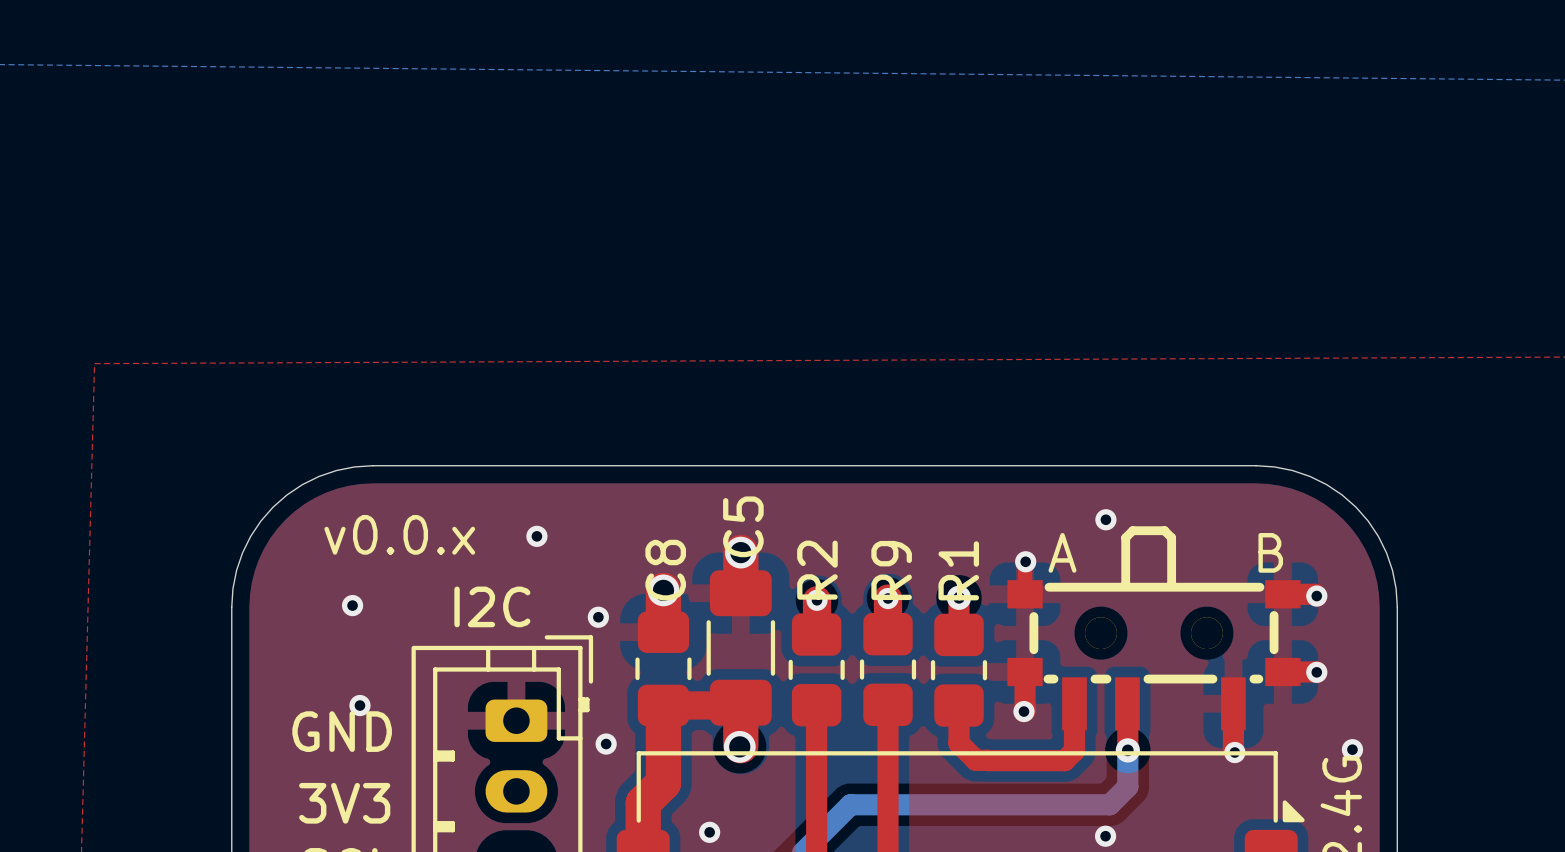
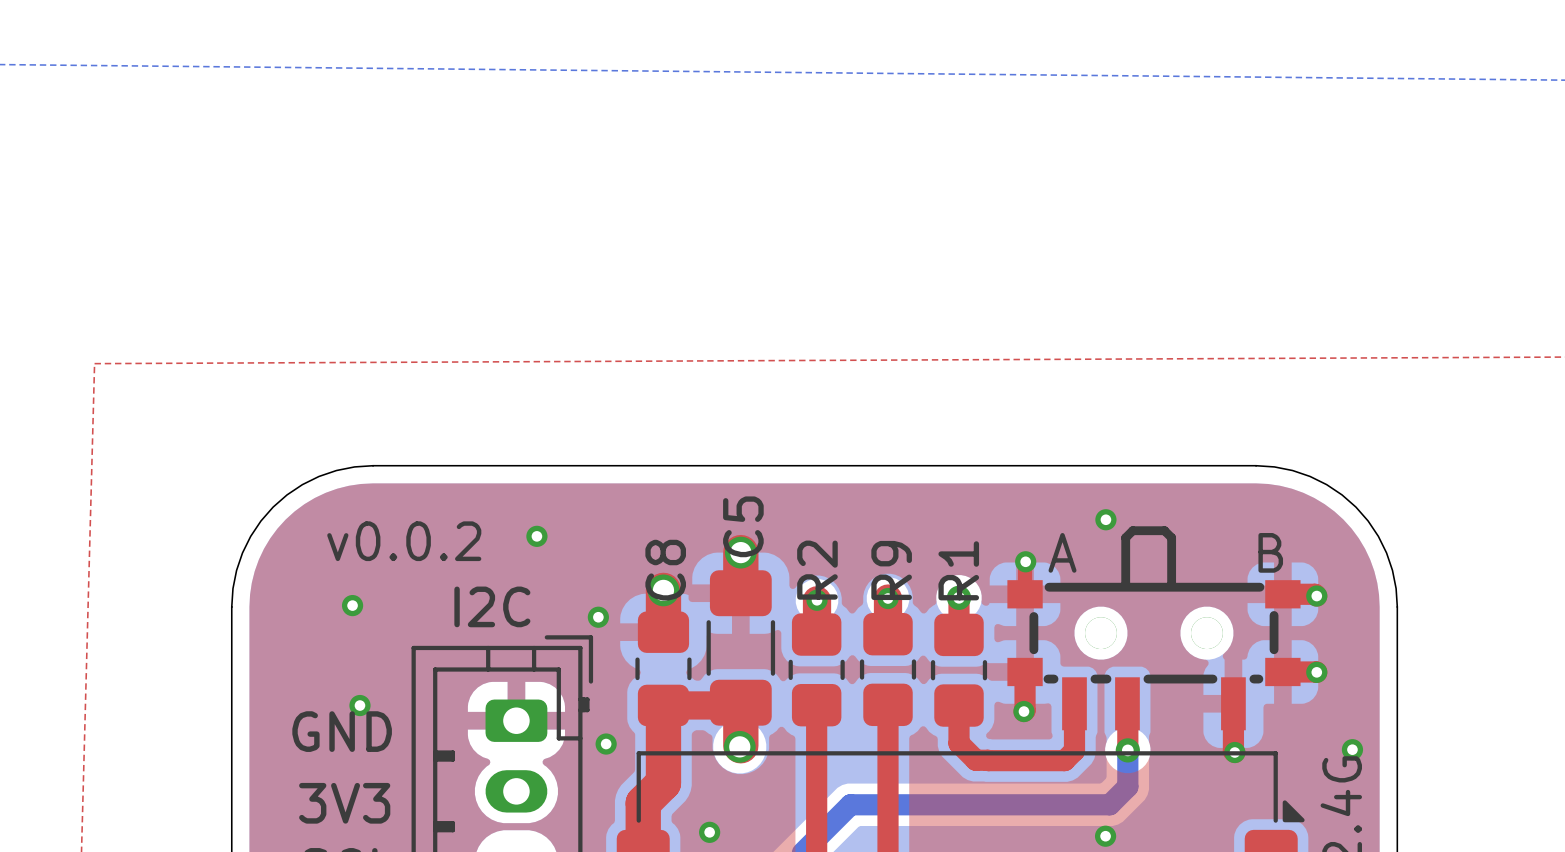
text: v0.0.x (399, 534) -> v0.0.2 (404, 541)

